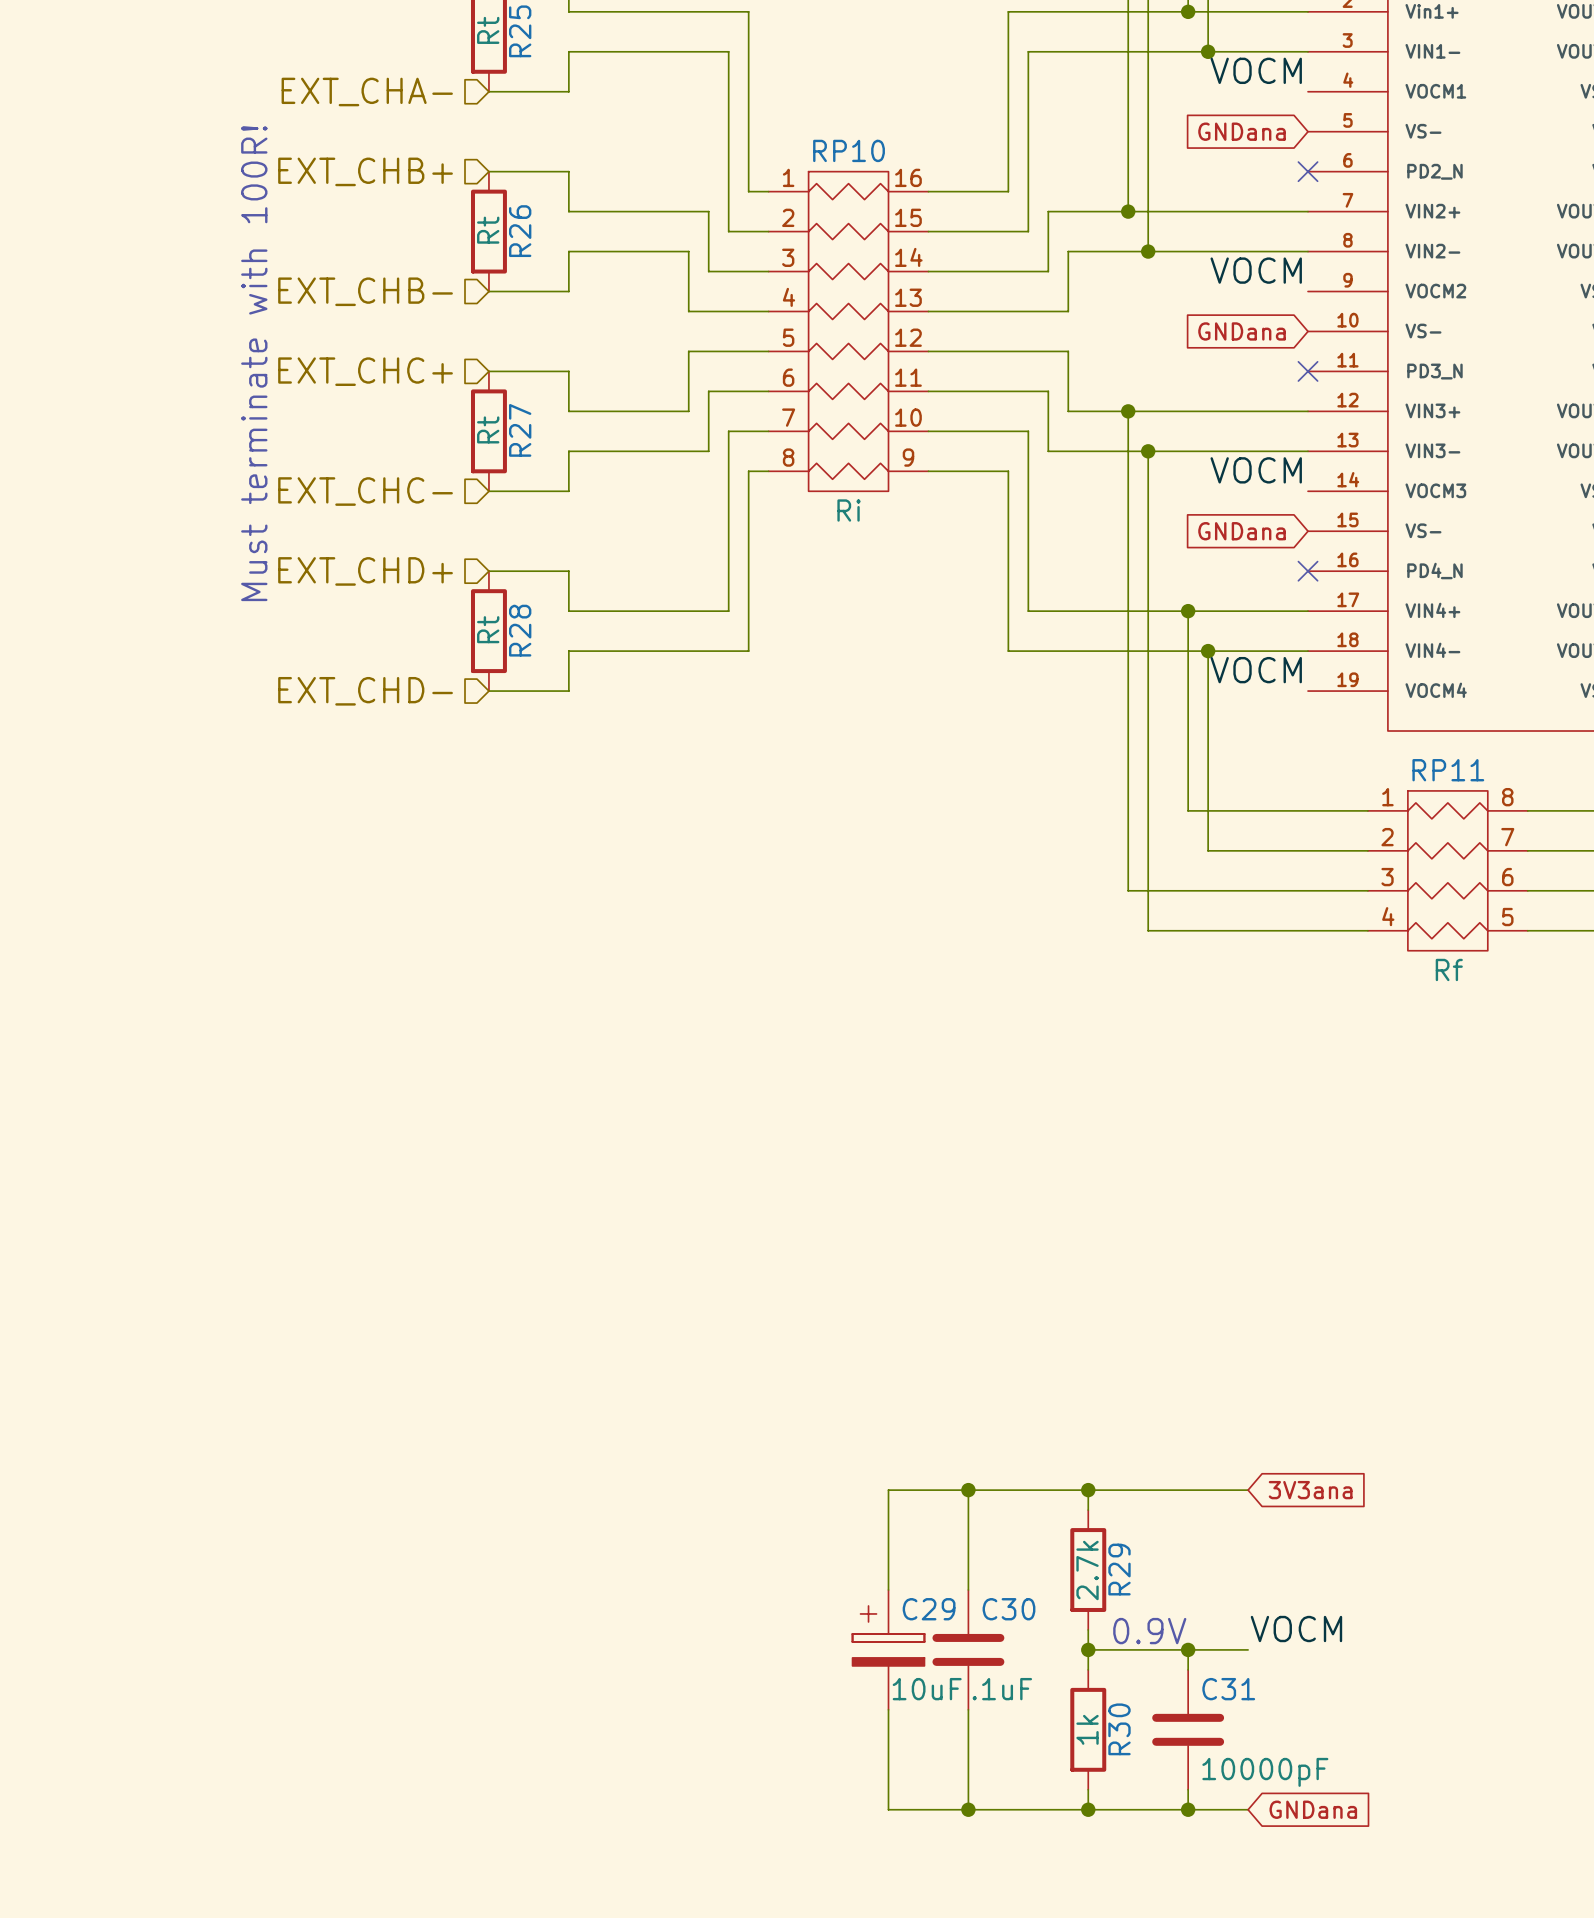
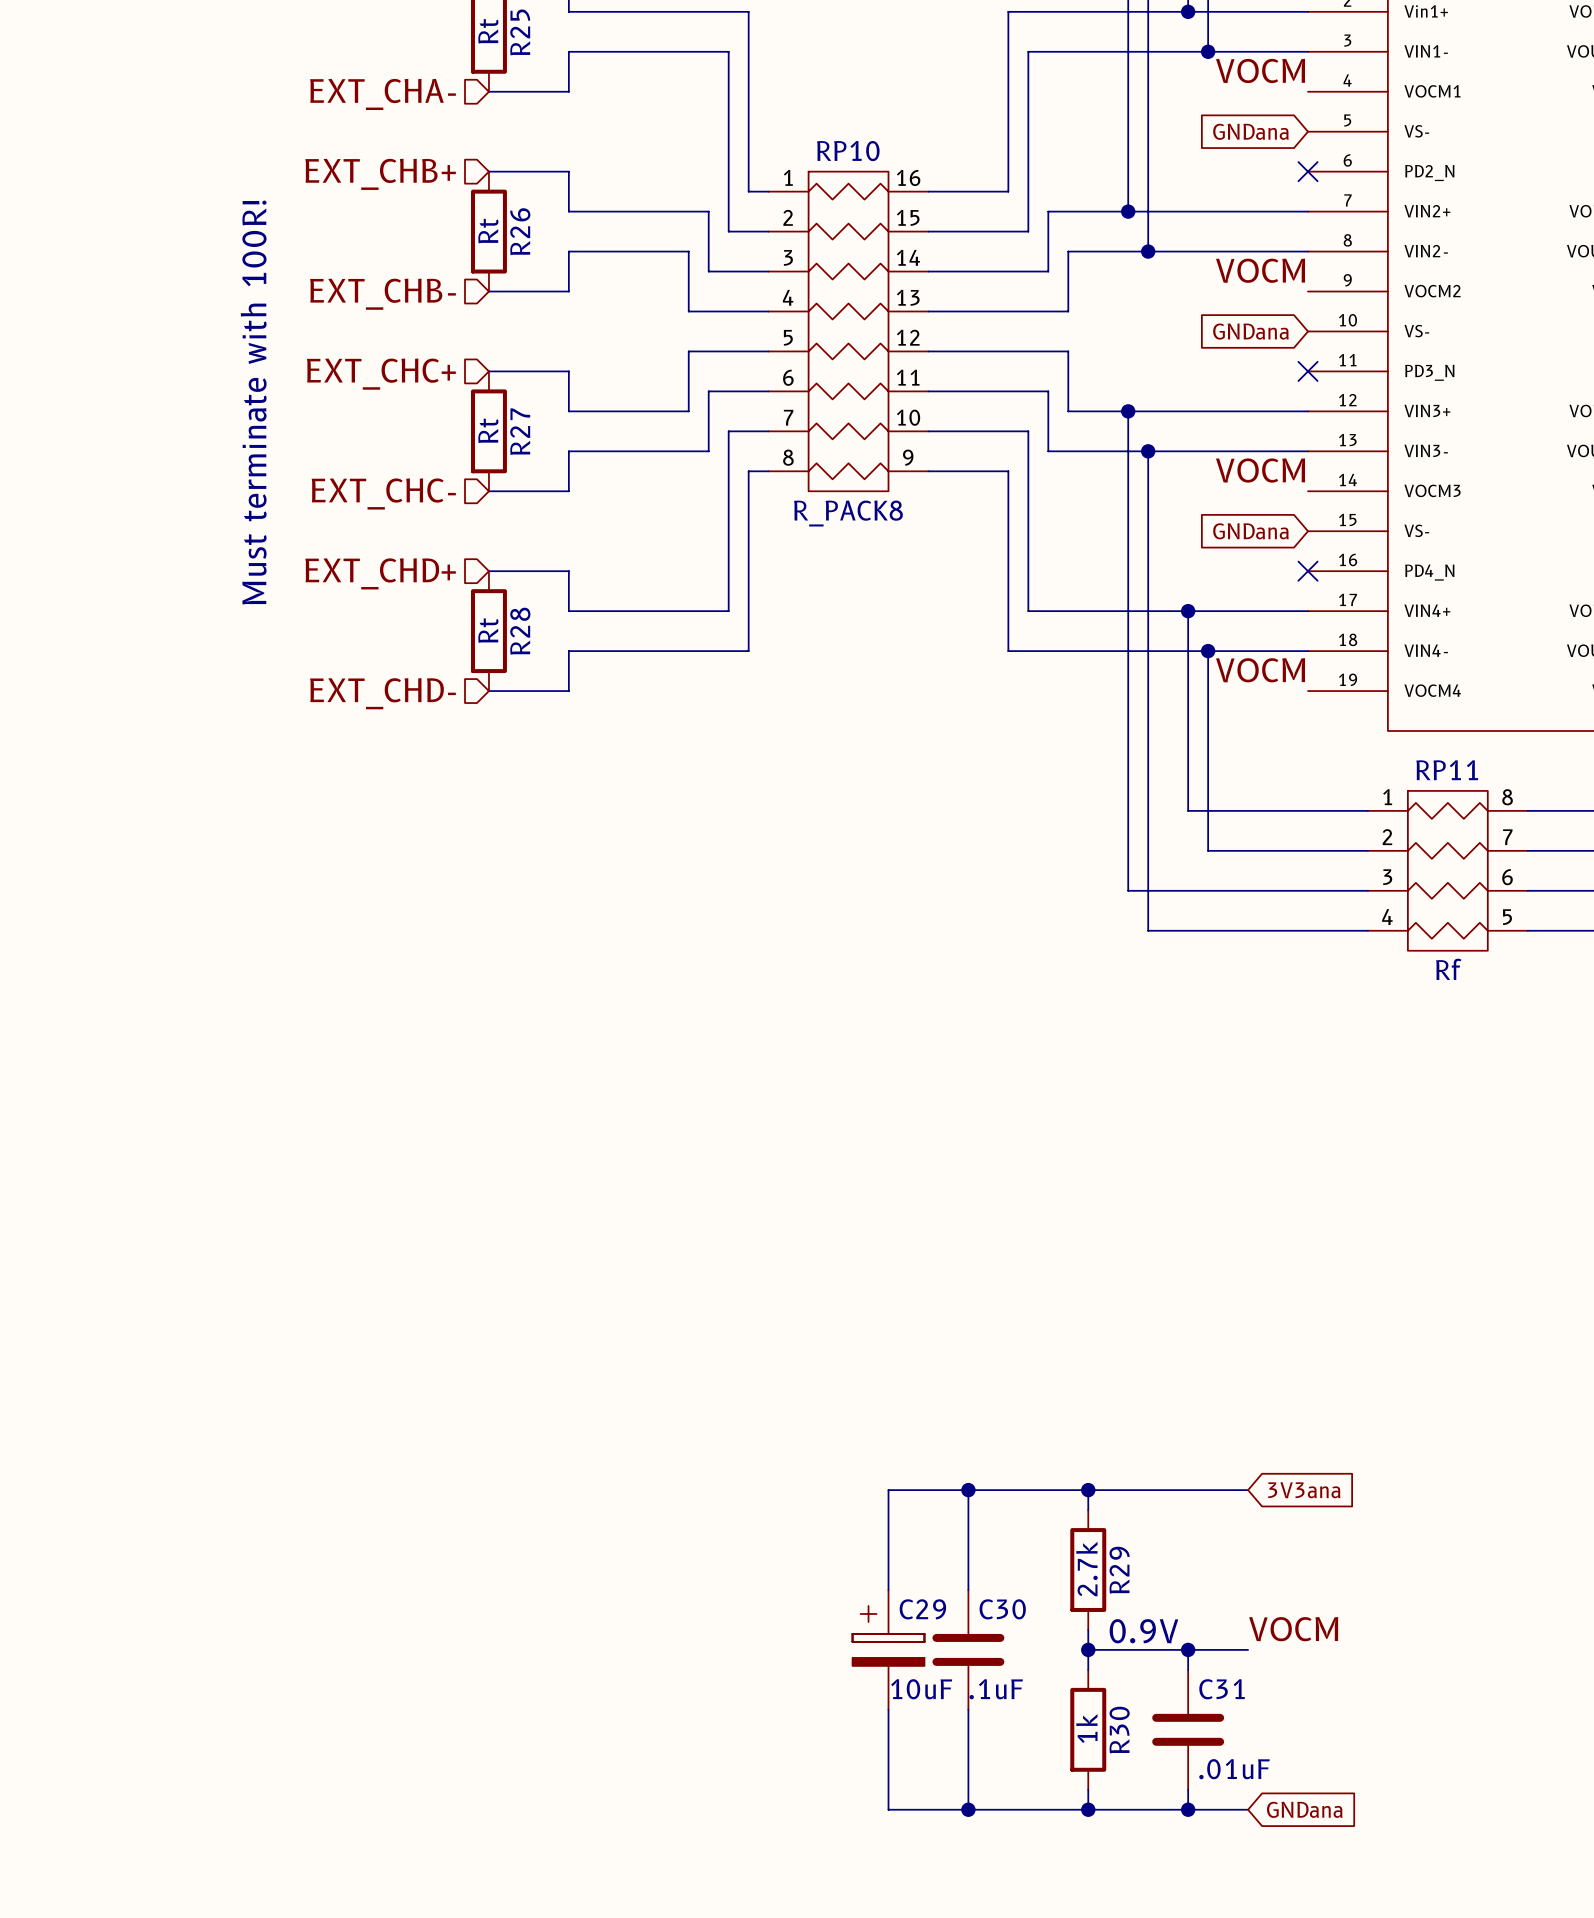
RP10 value: Ri (849, 510) -> R_PACK8 (848, 513)
C31 value: 10000pF (1265, 1772) -> .01uF (1234, 1769)

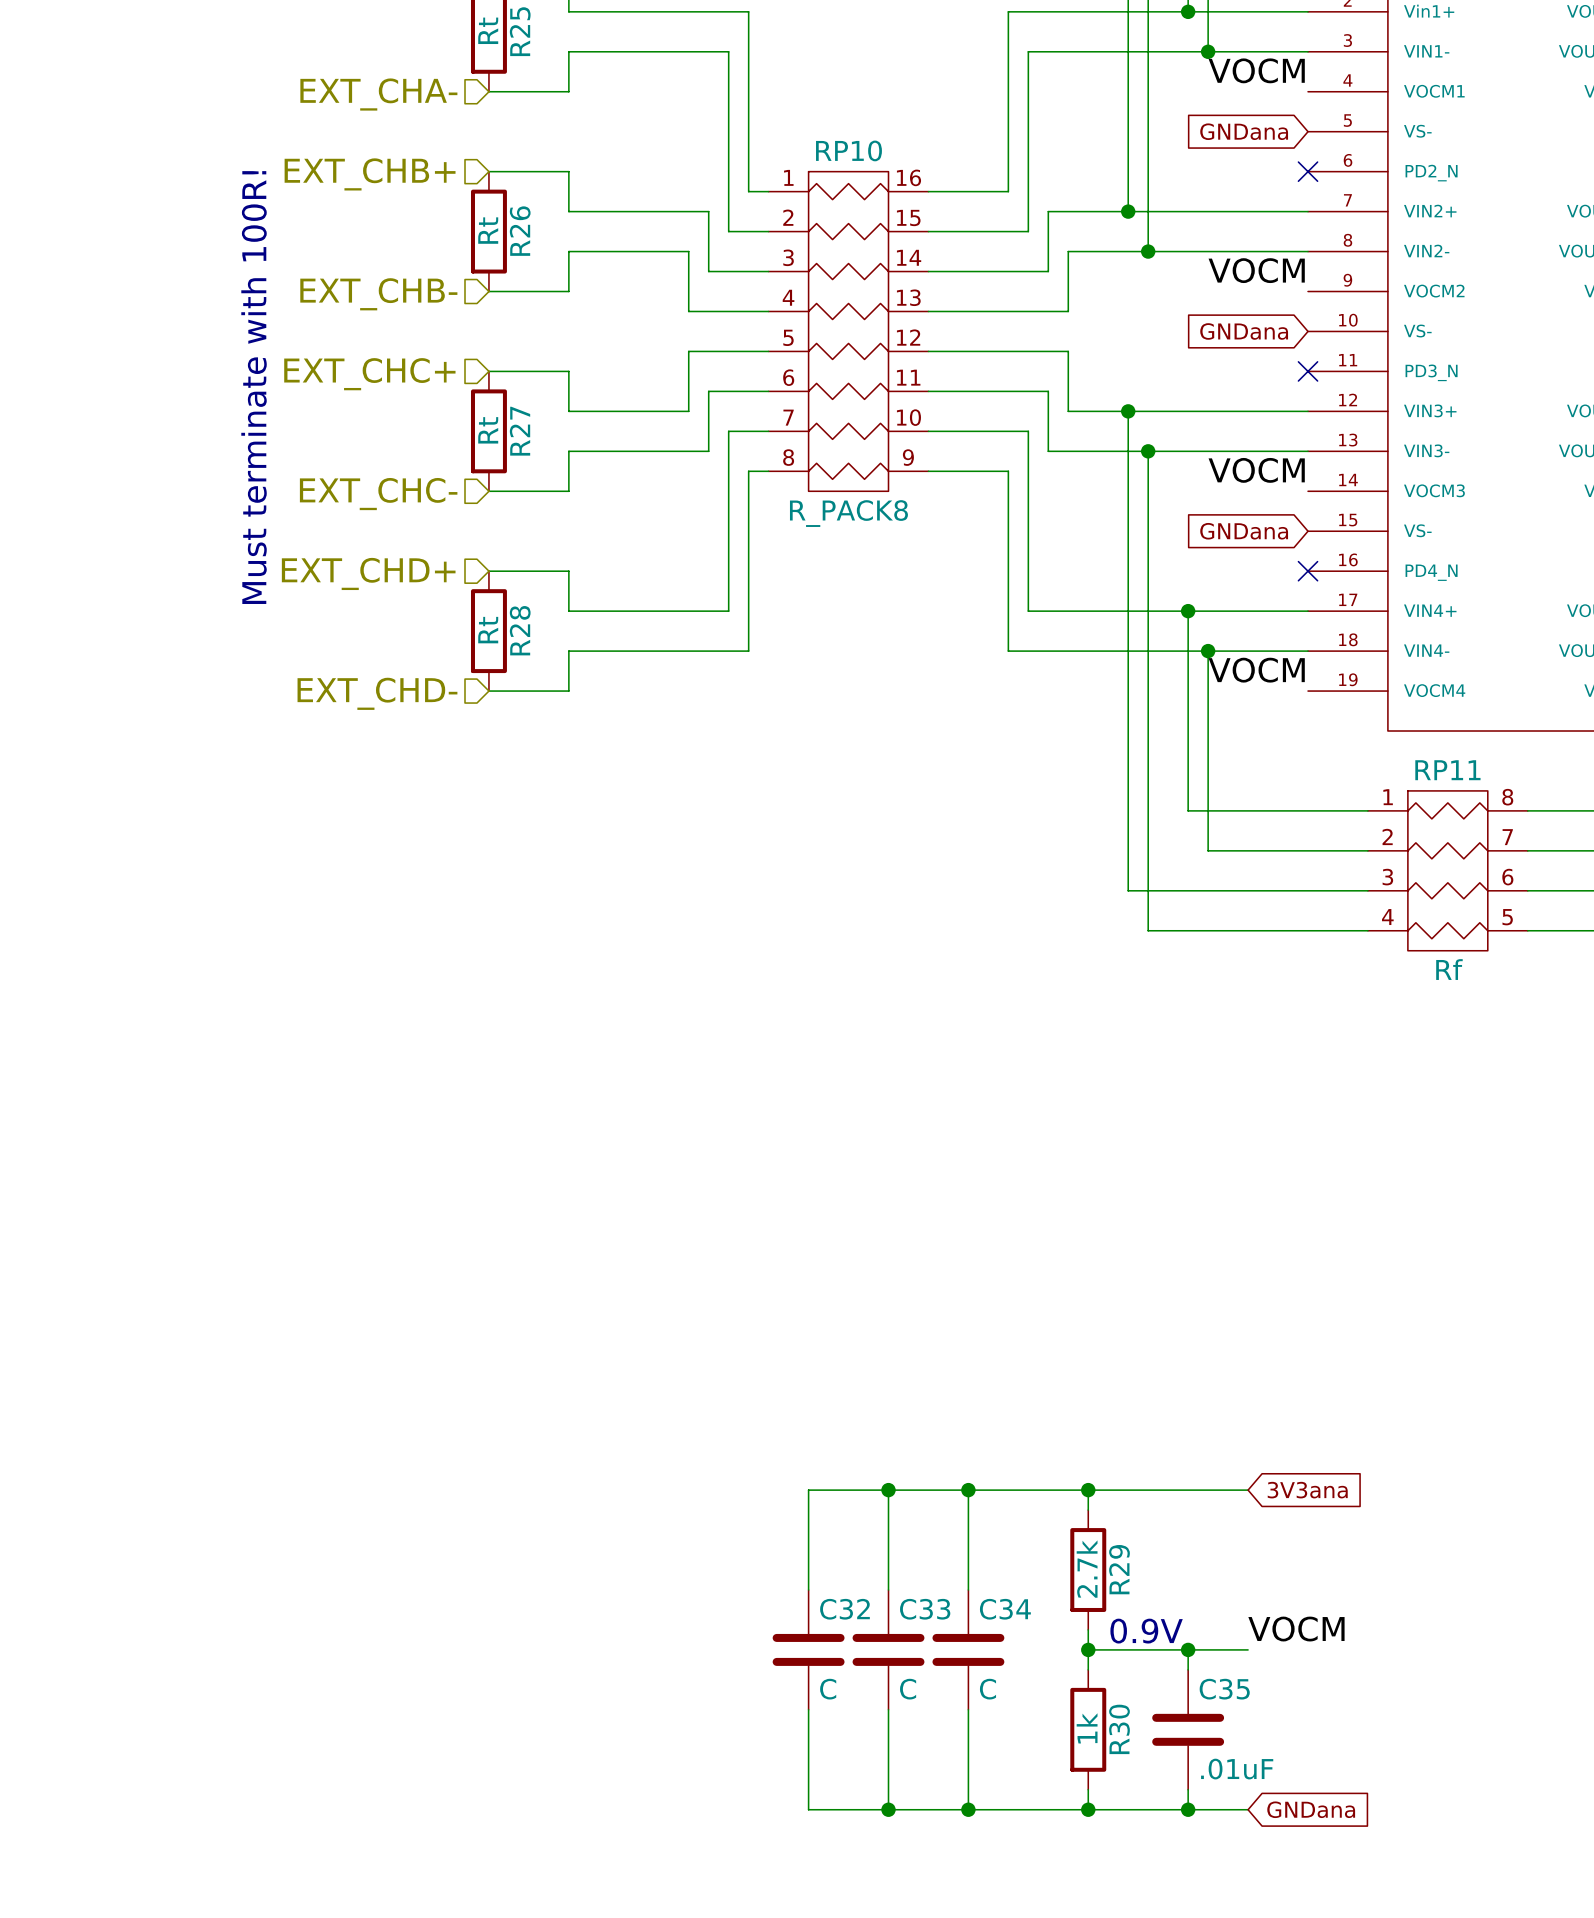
wire: none -> (888, 1490) (808, 1490) (808, 1590)
junction: none -> (888, 1490)
C30 name: C30 (1002, 1609) -> C34 (1005, 1609)
C32: none -> C (808, 1649)
C29: 10uF (888, 1649) -> none
C33: none -> C (888, 1649)
C30 value: .1uF (996, 1689) -> C (987, 1689)
C31 name: C31 (1222, 1689) -> C35 (1224, 1689)
wire: none -> (808, 1709) (808, 1809) (888, 1809)
junction: none -> (888, 1809)

